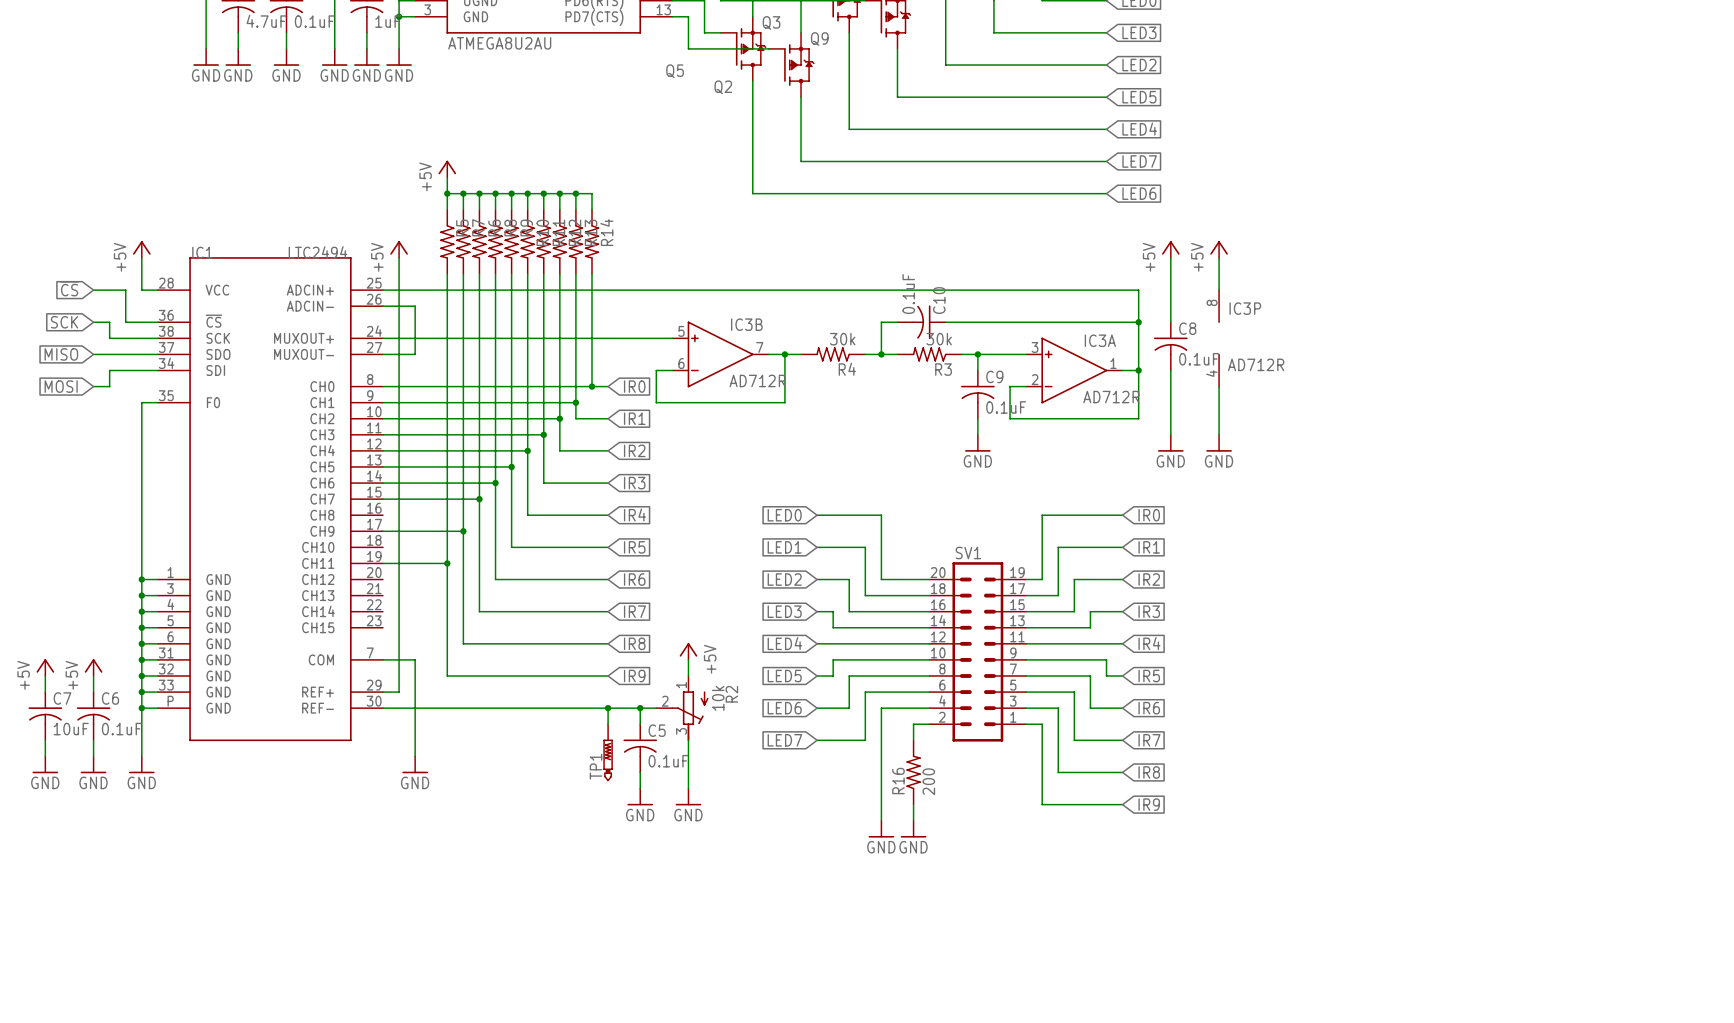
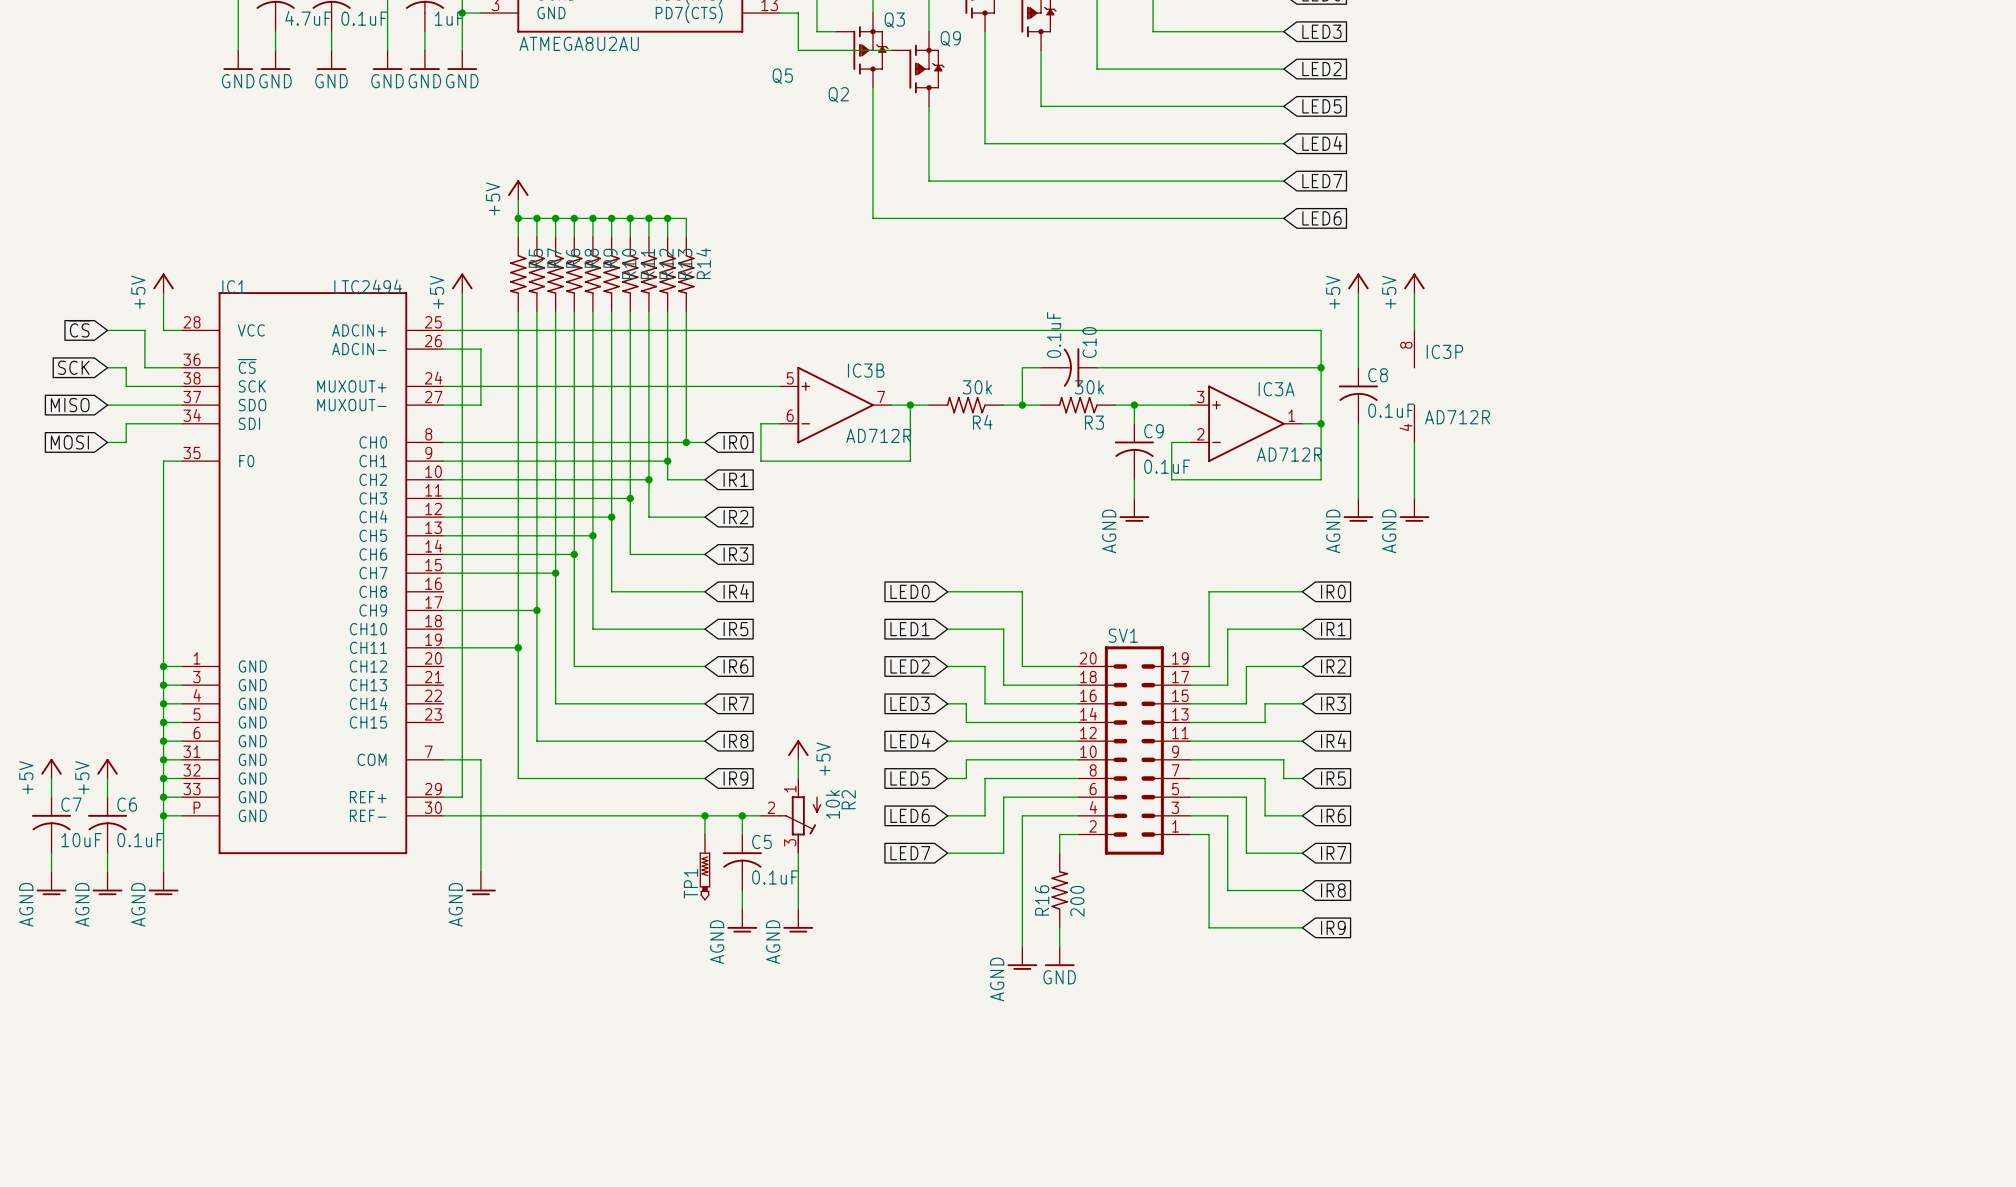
power symbol: GND (977, 443) -> AGND (1134, 510)
power symbol: GND (1170, 443) -> AGND (1358, 510)
power symbol: GND (1219, 443) -> AGND (1414, 510)
power symbol: GND (45, 764) -> AGND (51, 883)
power symbol: GND (93, 764) -> AGND (107, 883)
power symbol: GND (141, 764) -> AGND (163, 883)
power symbol: GND (415, 764) -> AGND (480, 883)
power symbol: GND (640, 796) -> AGND (742, 920)
power symbol: GND (688, 796) -> AGND (798, 920)
power symbol: GND (881, 829) -> AGND (1022, 958)

